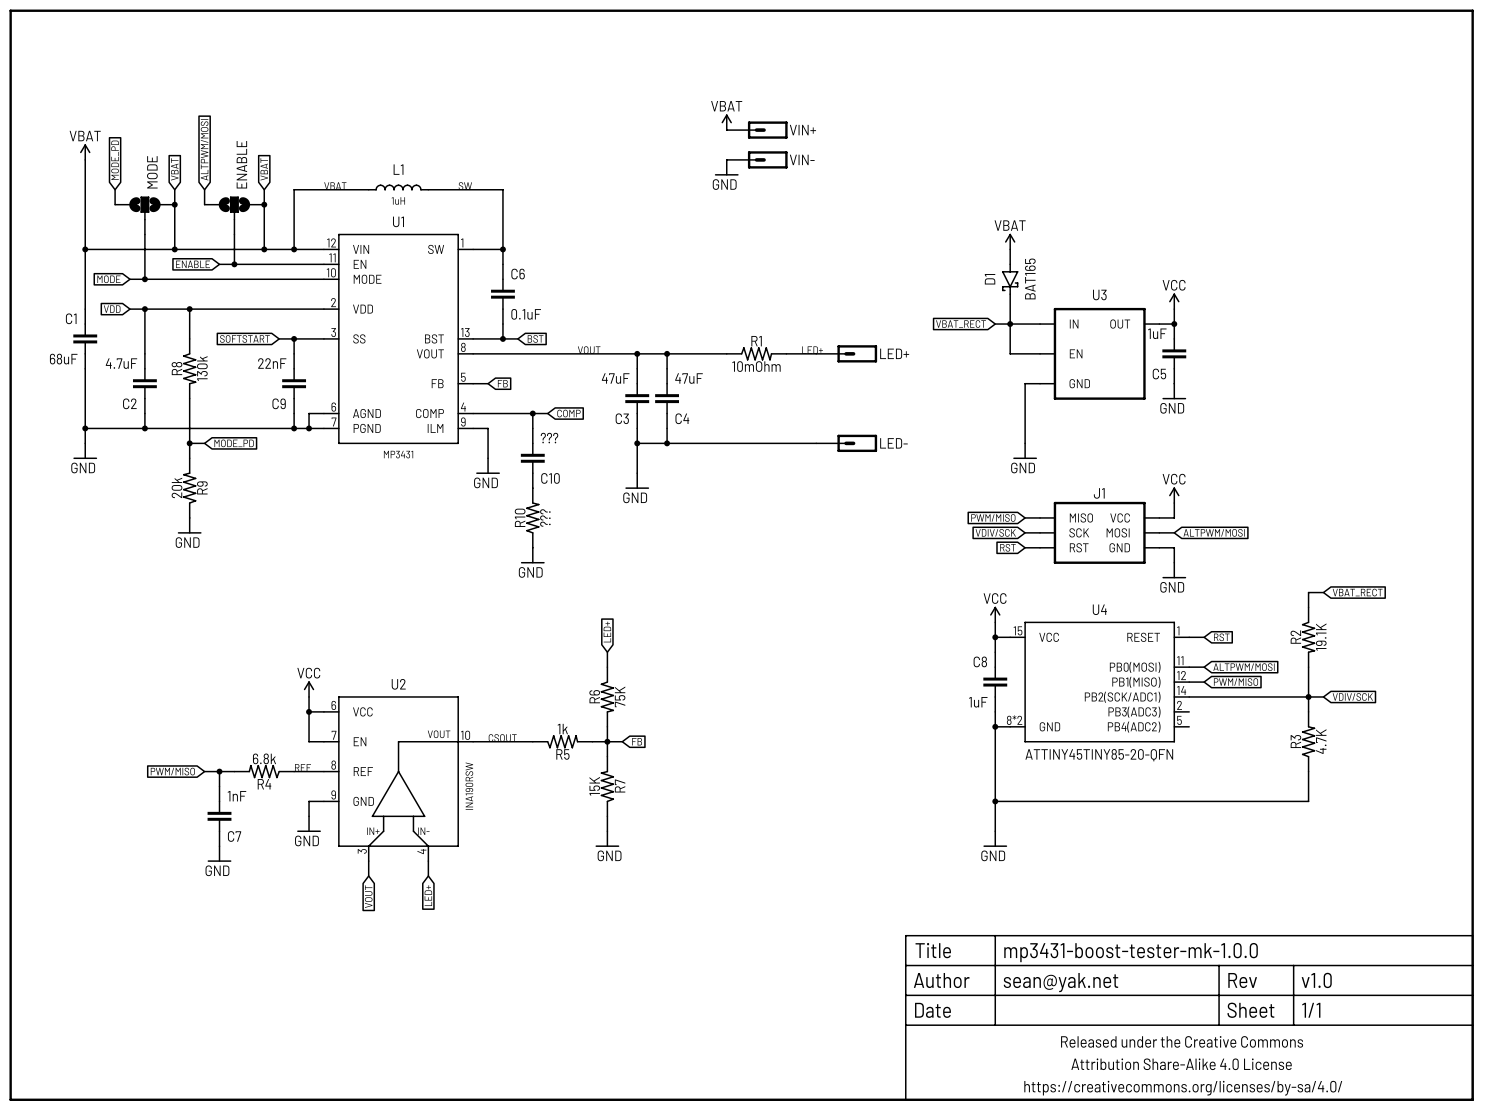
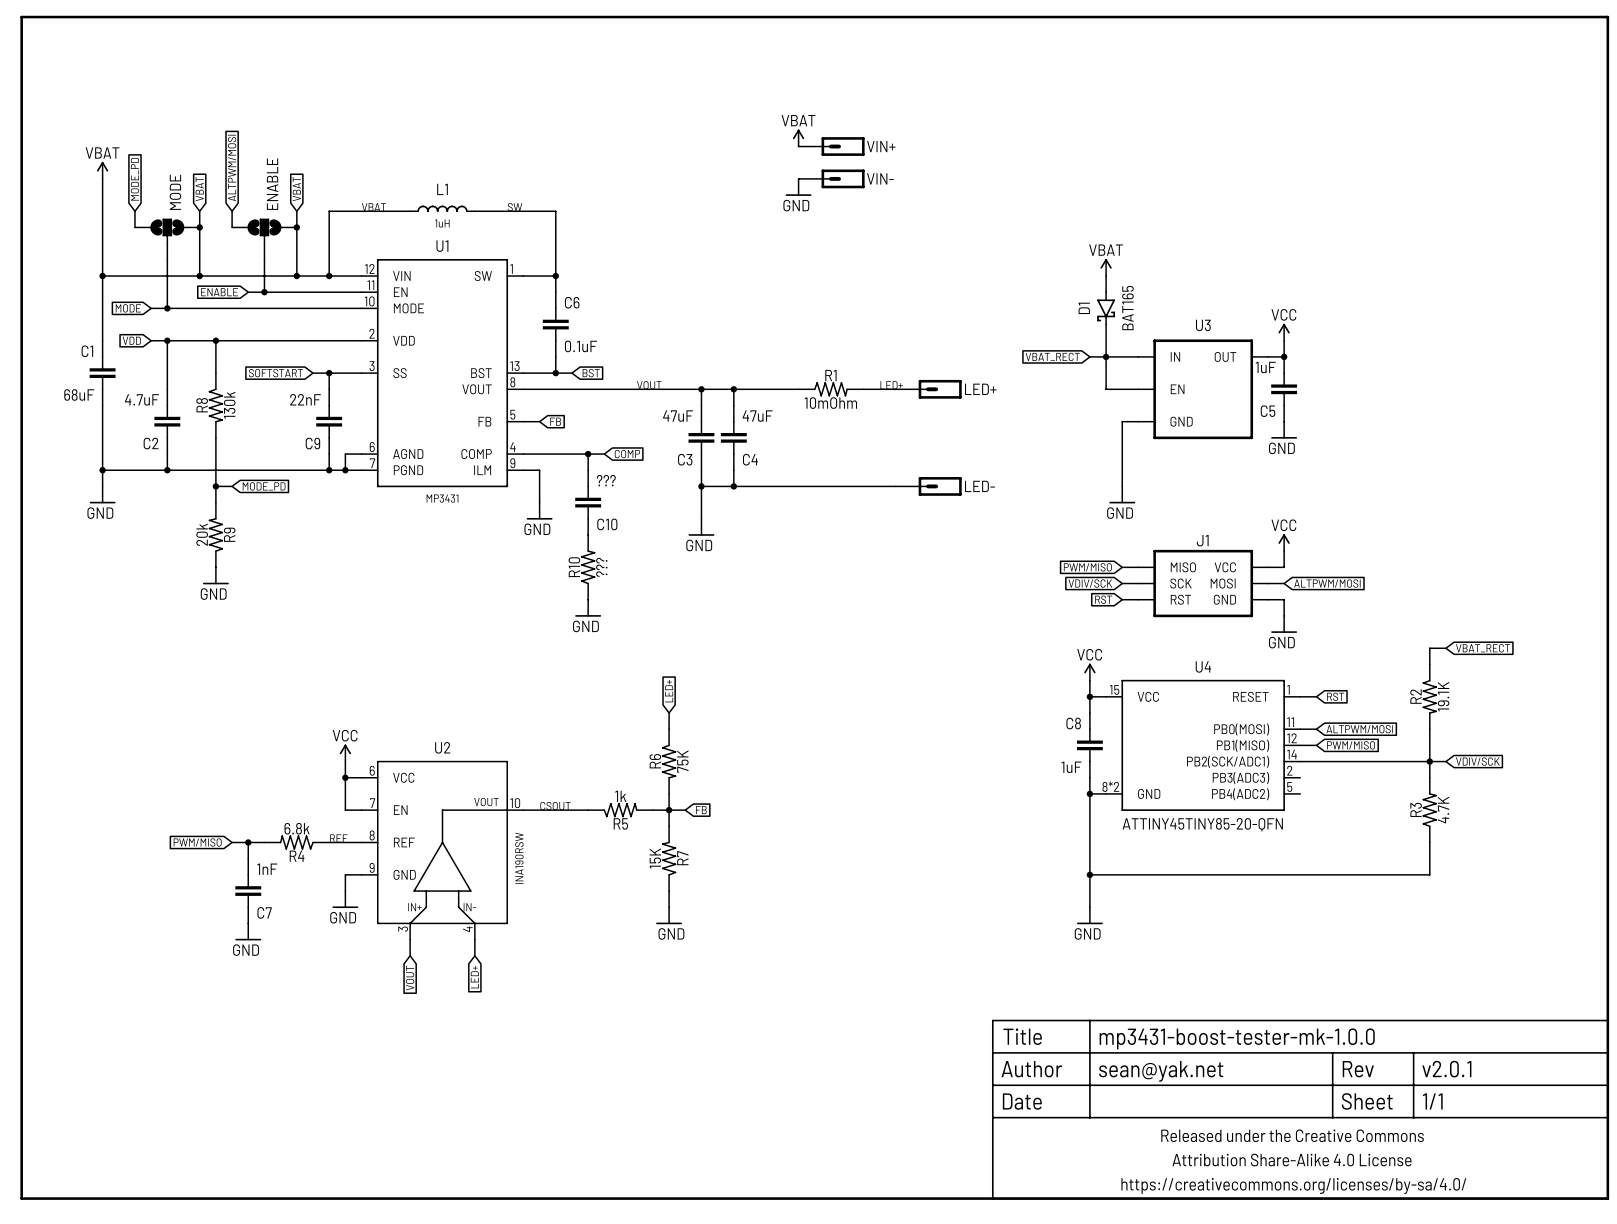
part text: v1.0 (1316, 980) -> v2.0.1 (1446, 1069)

